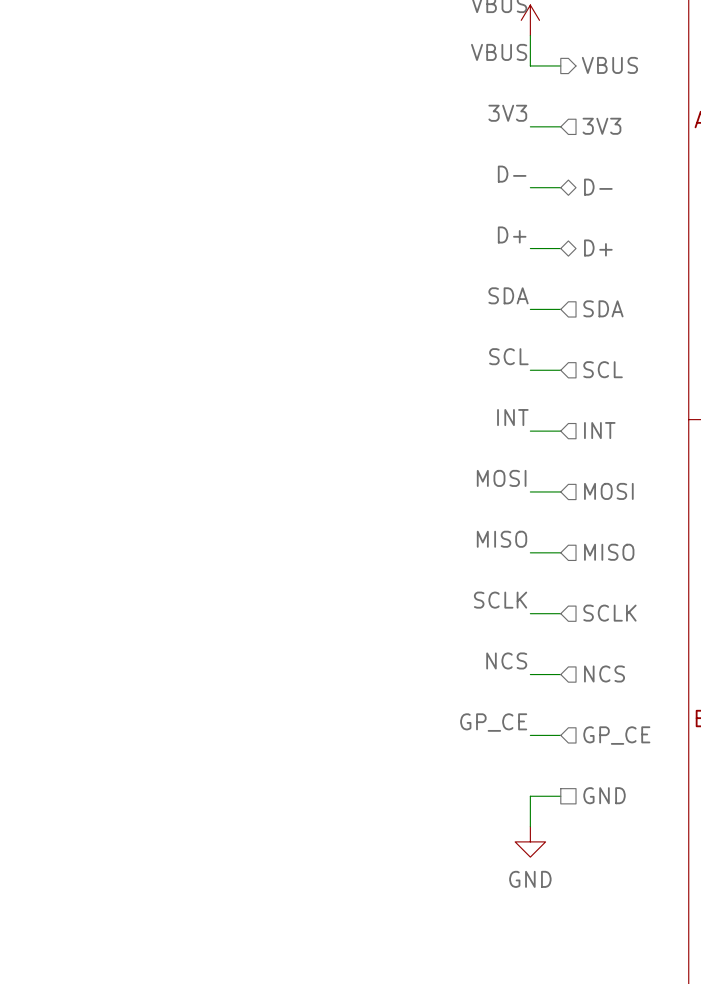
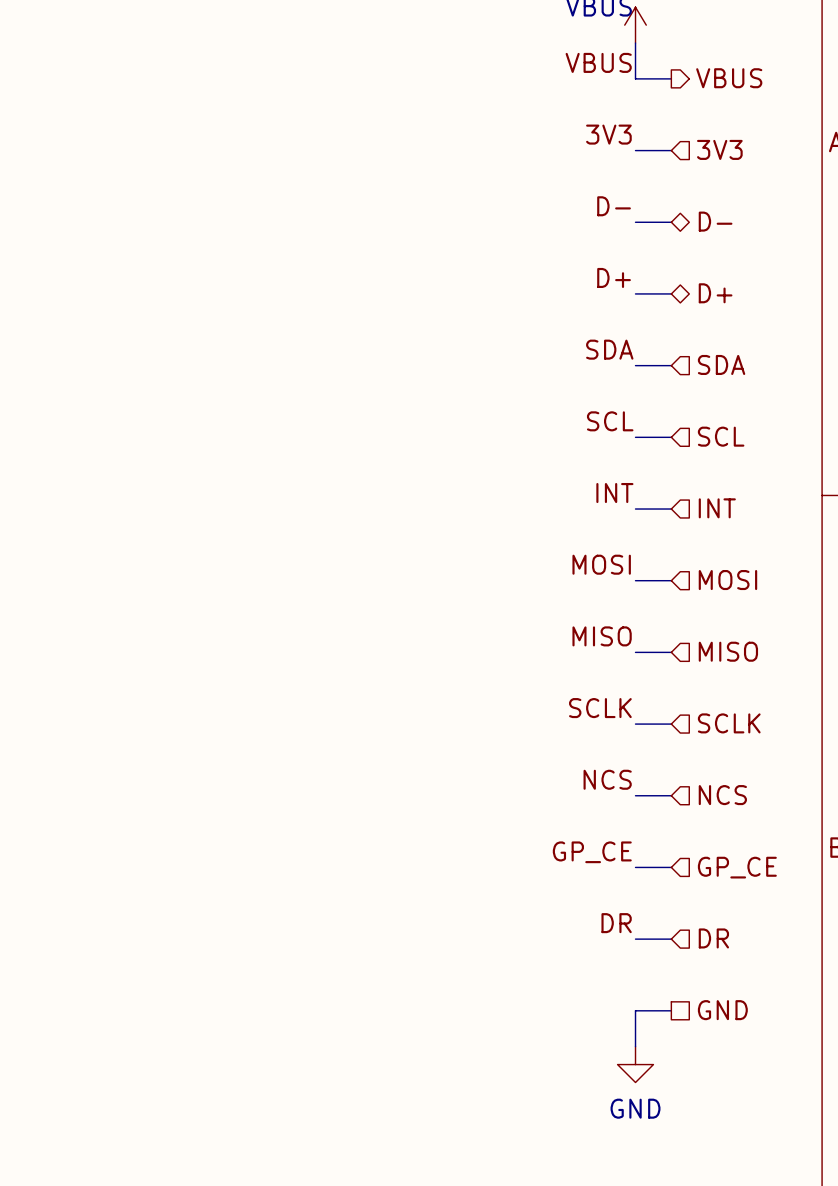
label: none -> DR (616, 923)
hierarchical label shape: passive (604, 795) -> input (713, 938)
hierarchical label: GND (604, 795) -> DR (713, 938)
wire: (530, 796) (530, 826) -> none
power symbol position: GND (530, 841) -> GND (635, 1064)
hierarchical label: none -> GND (722, 1010)
wire: none -> (671, 1010) (635, 1010) (635, 1046)

